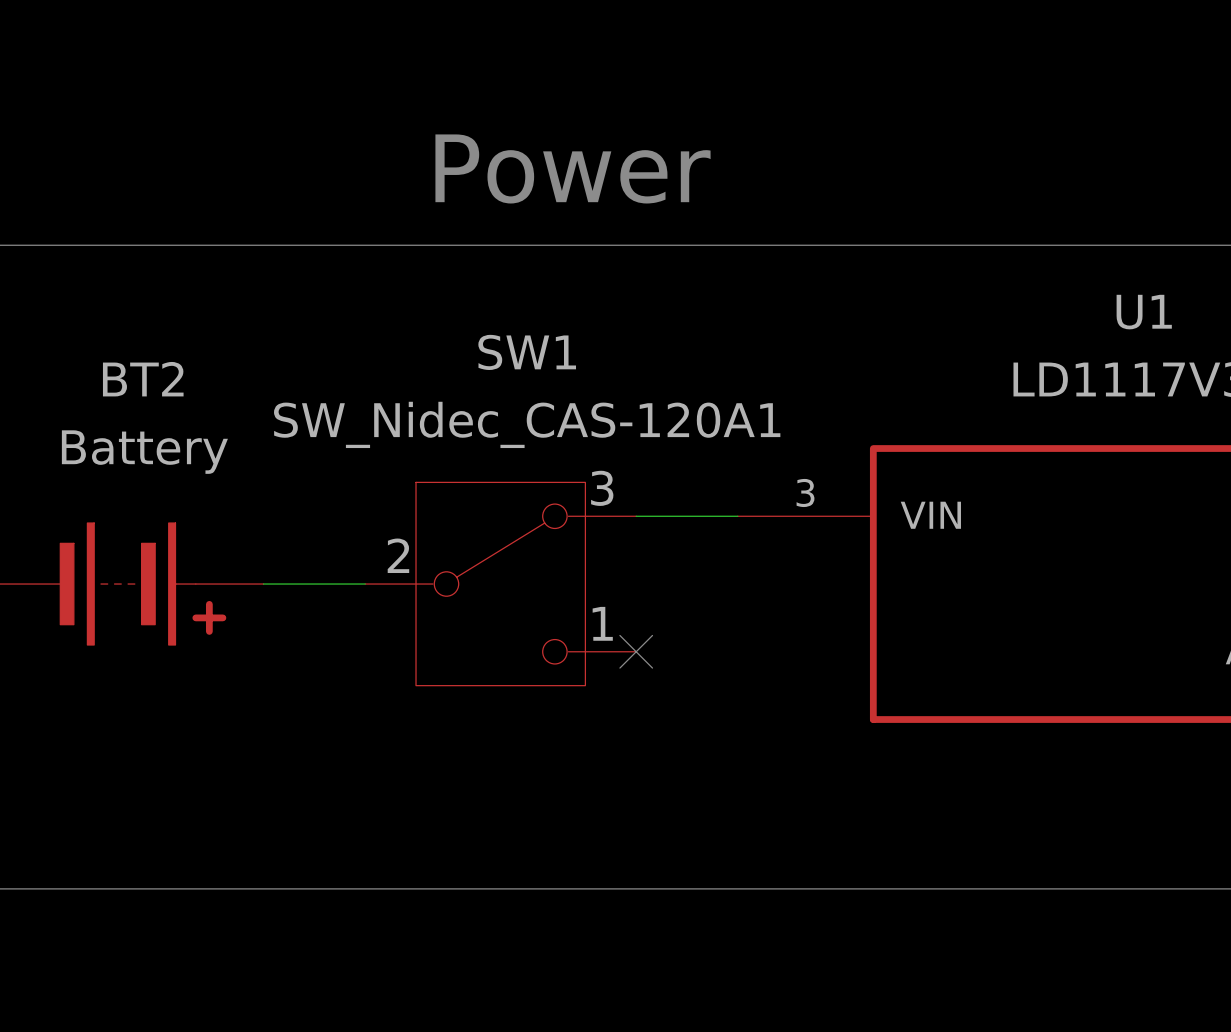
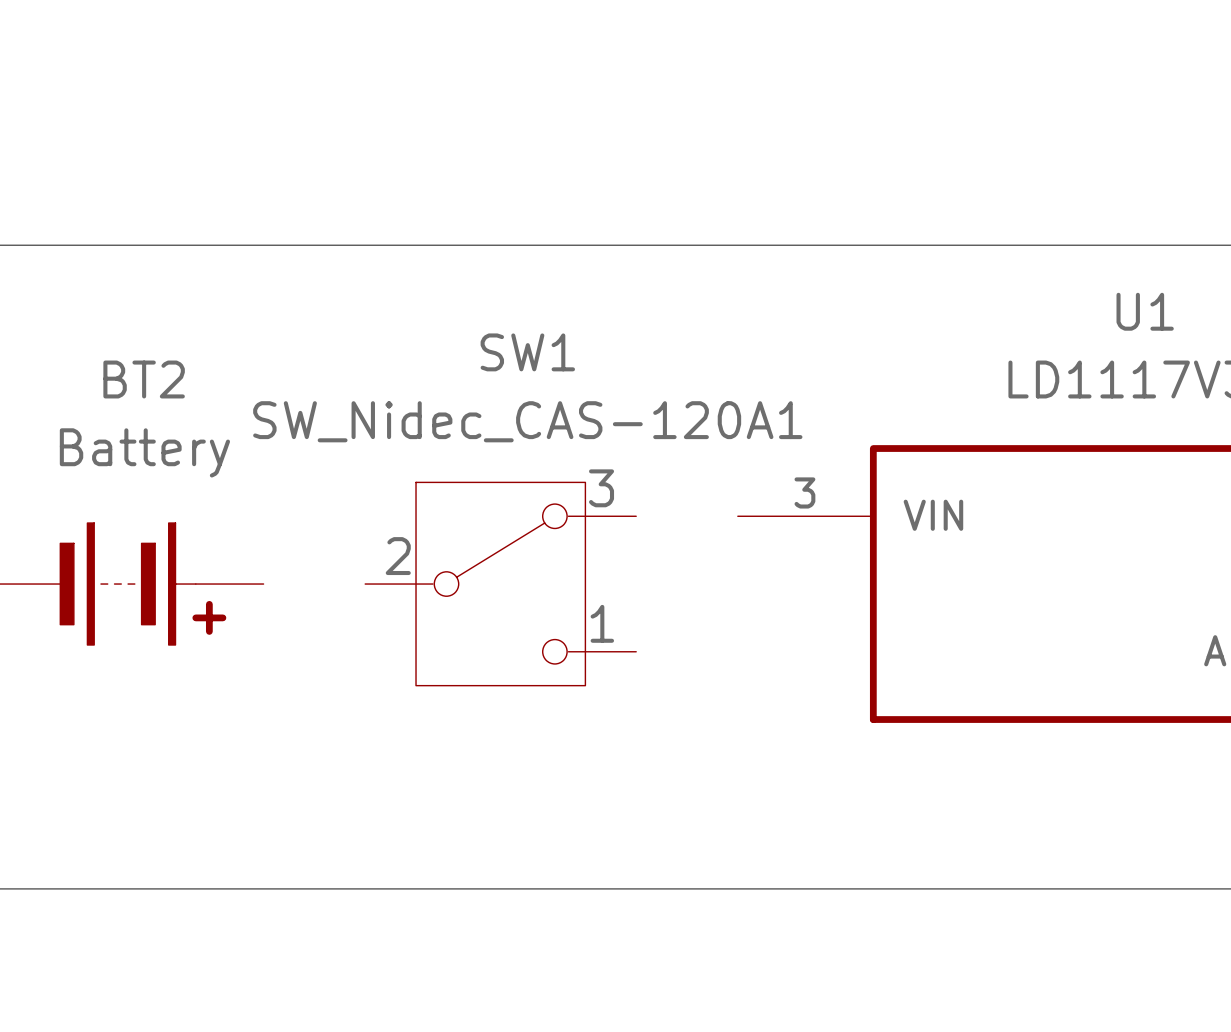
text: Power (573, 168) -> none
wire: (636, 516) (737, 516) -> none
wire: (263, 584) (365, 584) -> none
no-connect mark: (636, 651) -> none

